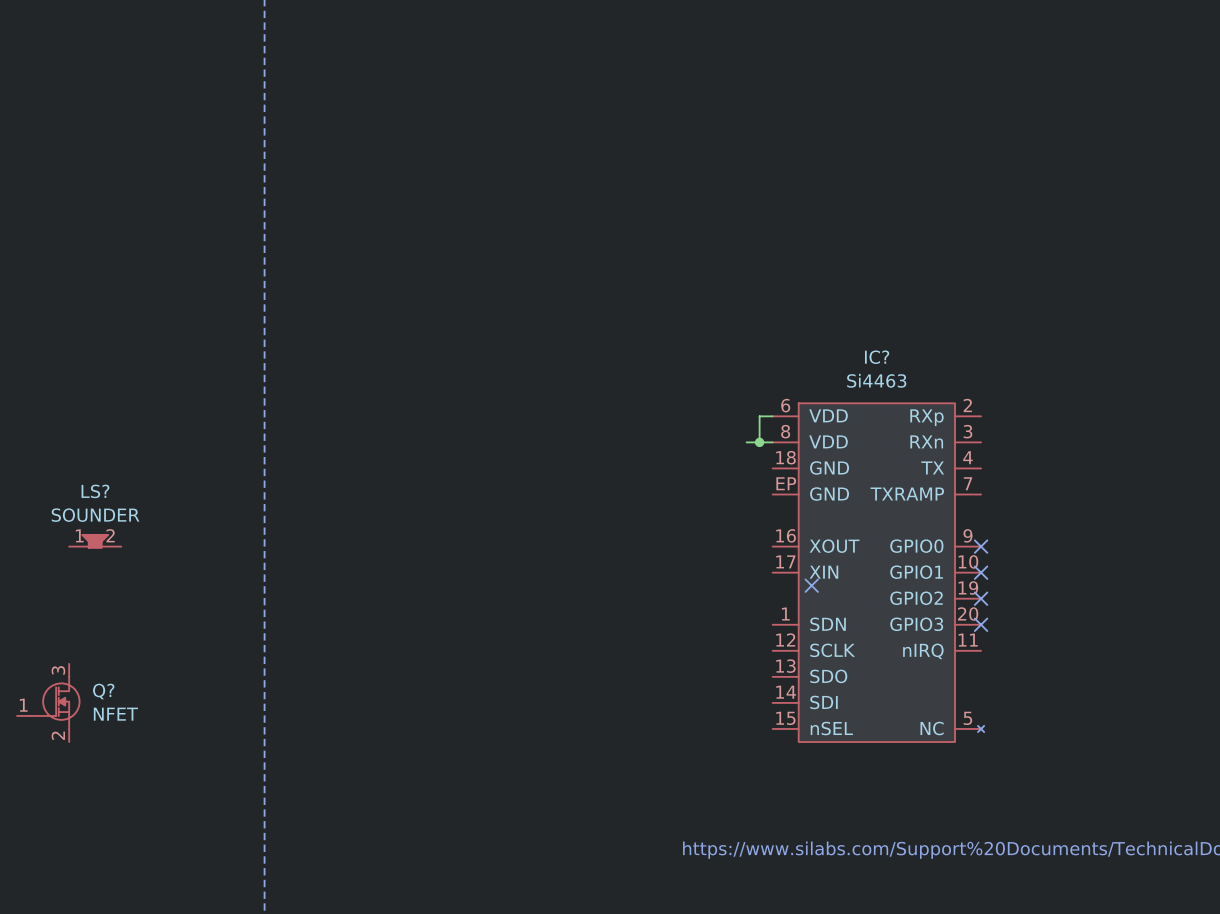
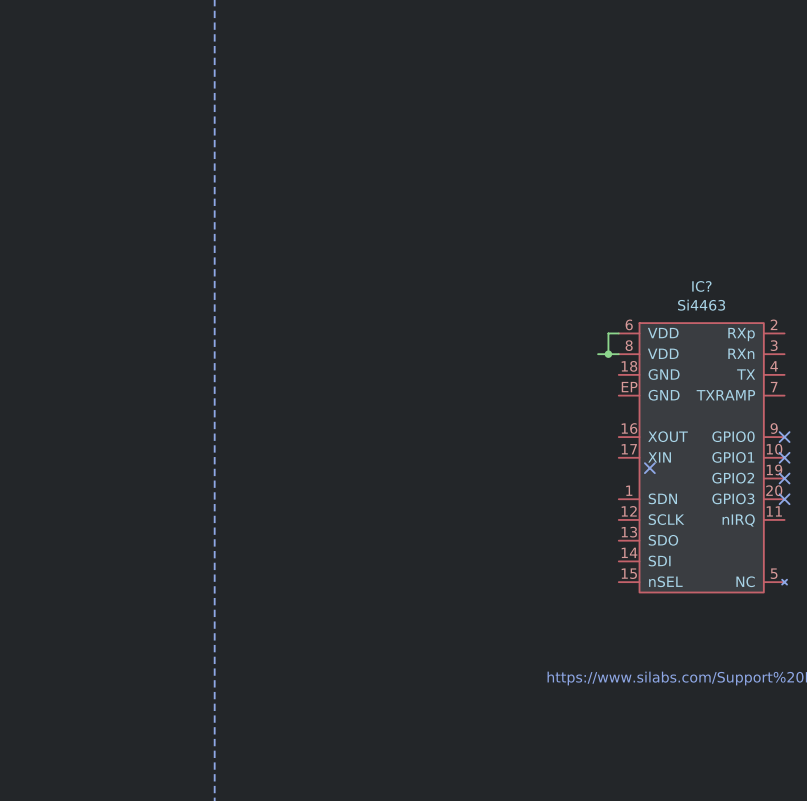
LS?: SOUNDER (95, 541) -> none
Q?: NFET (48, 702) -> none

